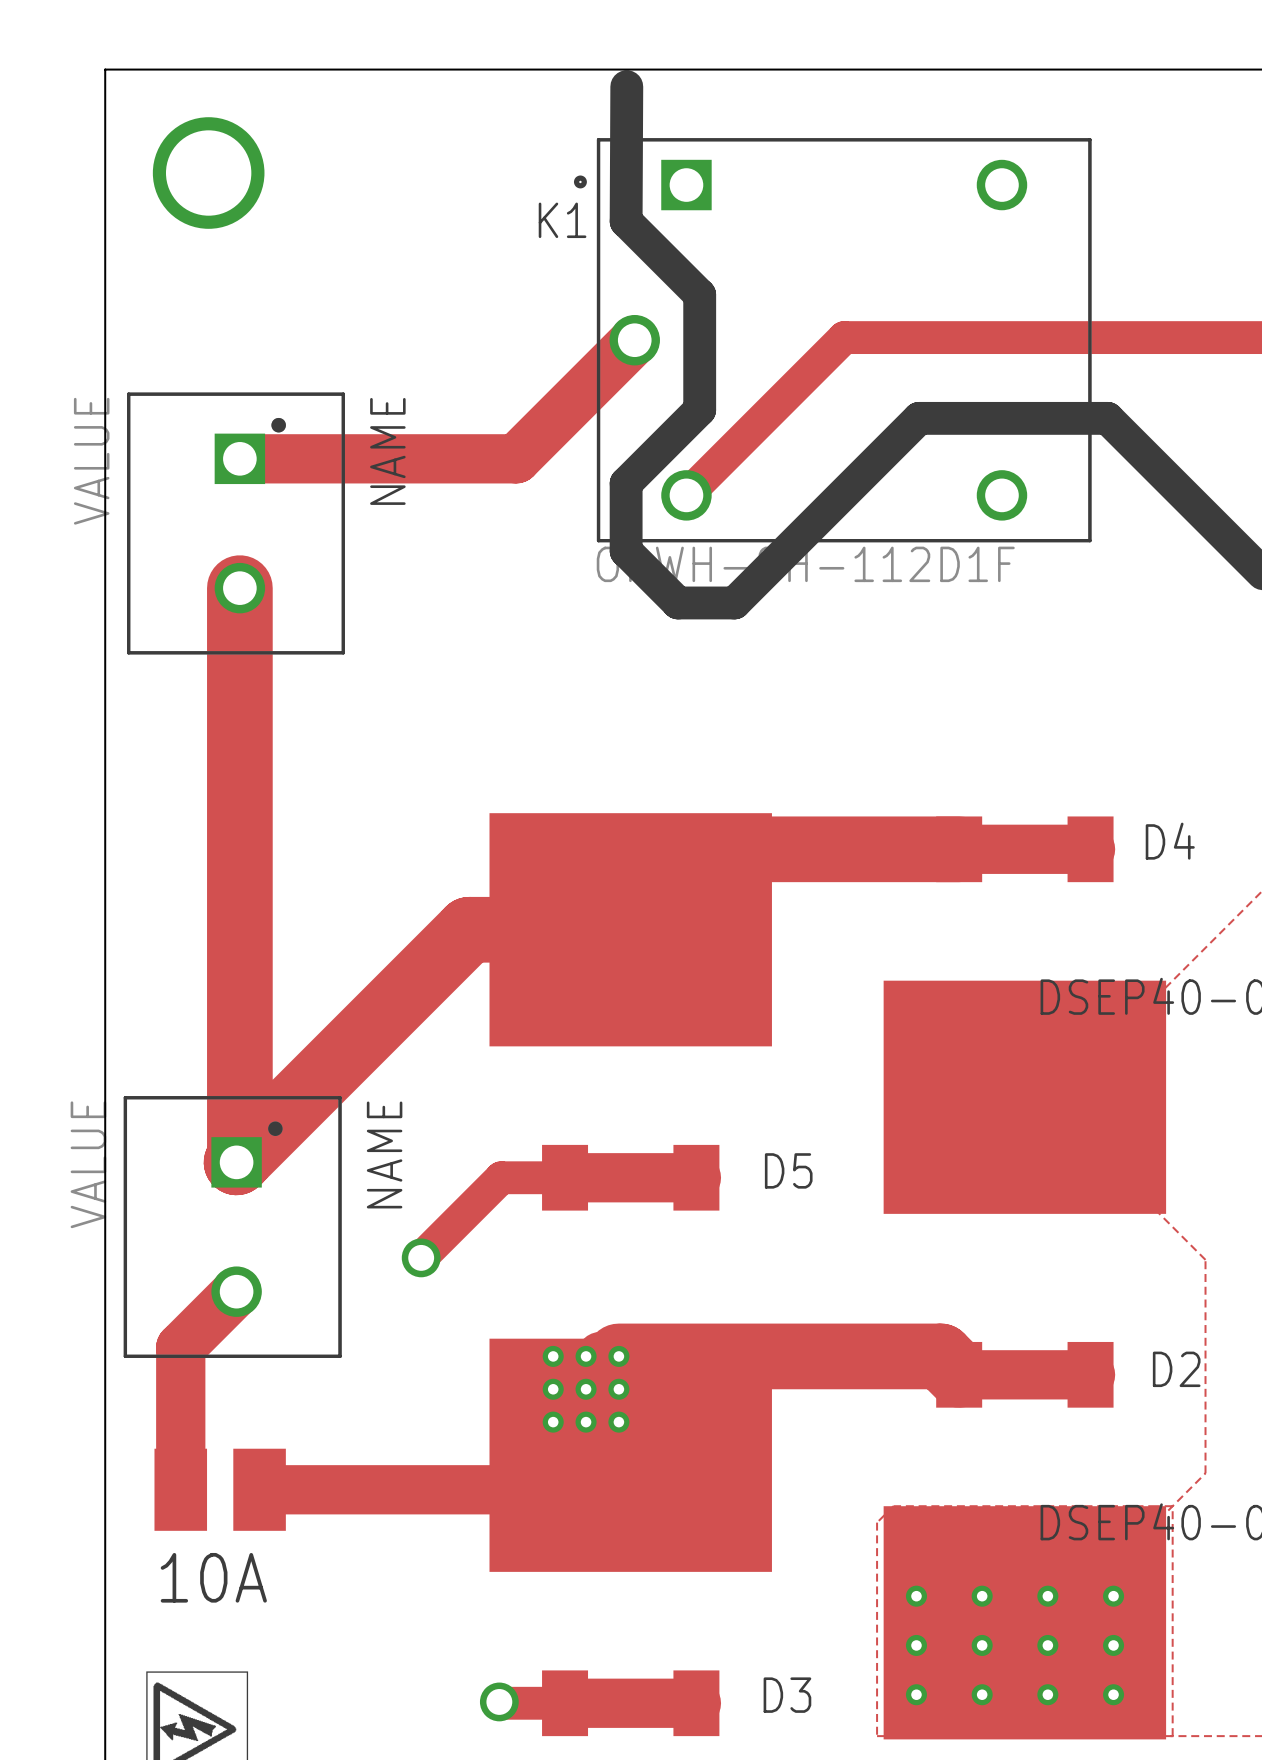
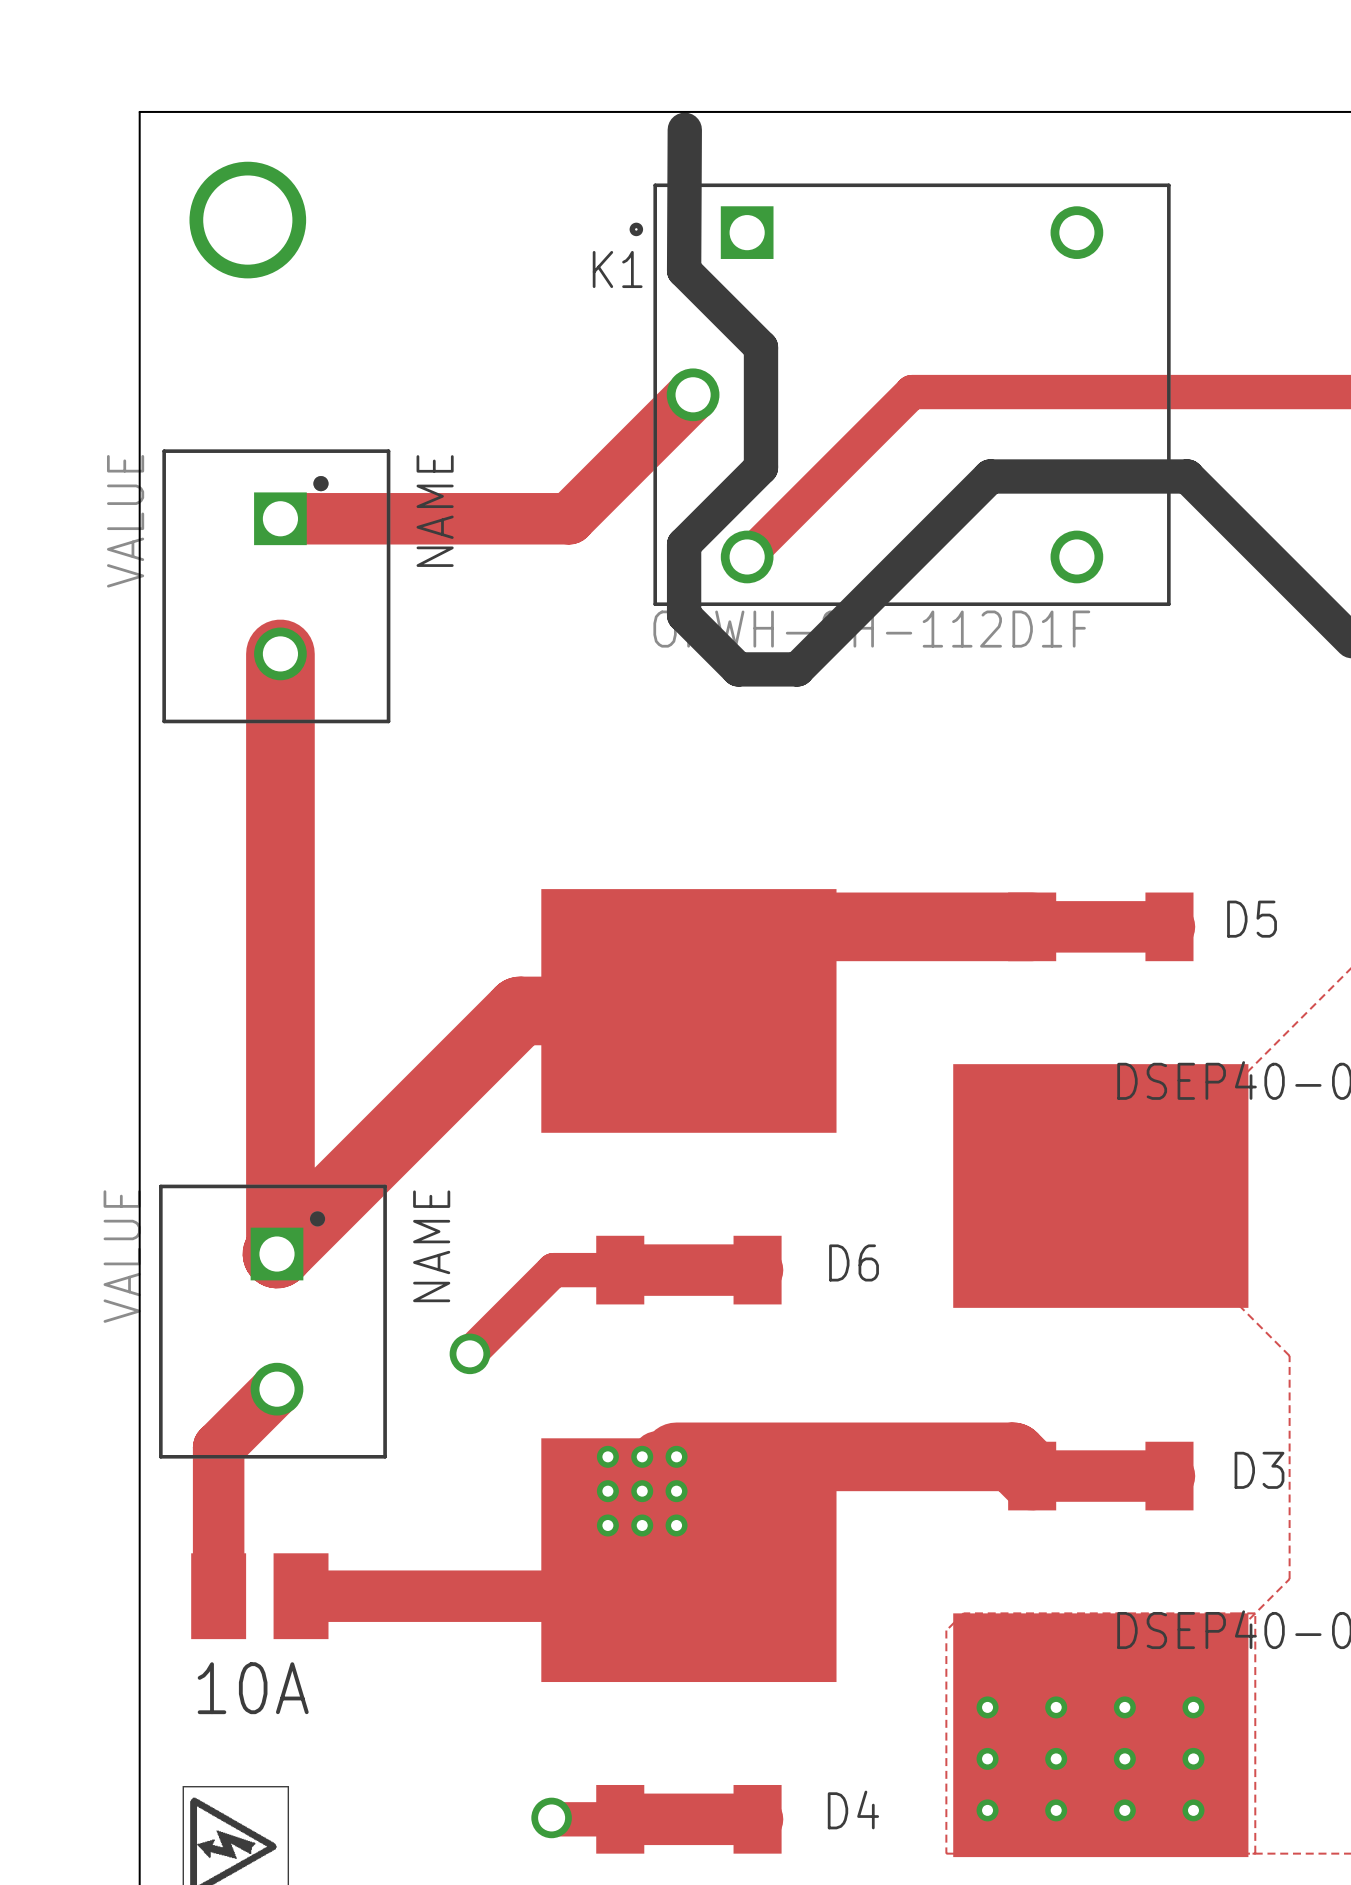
D4 name: D4 (1170, 841) -> D5 (1252, 919)
D5 name: D5 (788, 1170) -> D6 (854, 1262)
D2 name: D2 (1176, 1369) -> D3 (1259, 1470)
D3 name: D3 (787, 1695) -> D4 (853, 1809)

